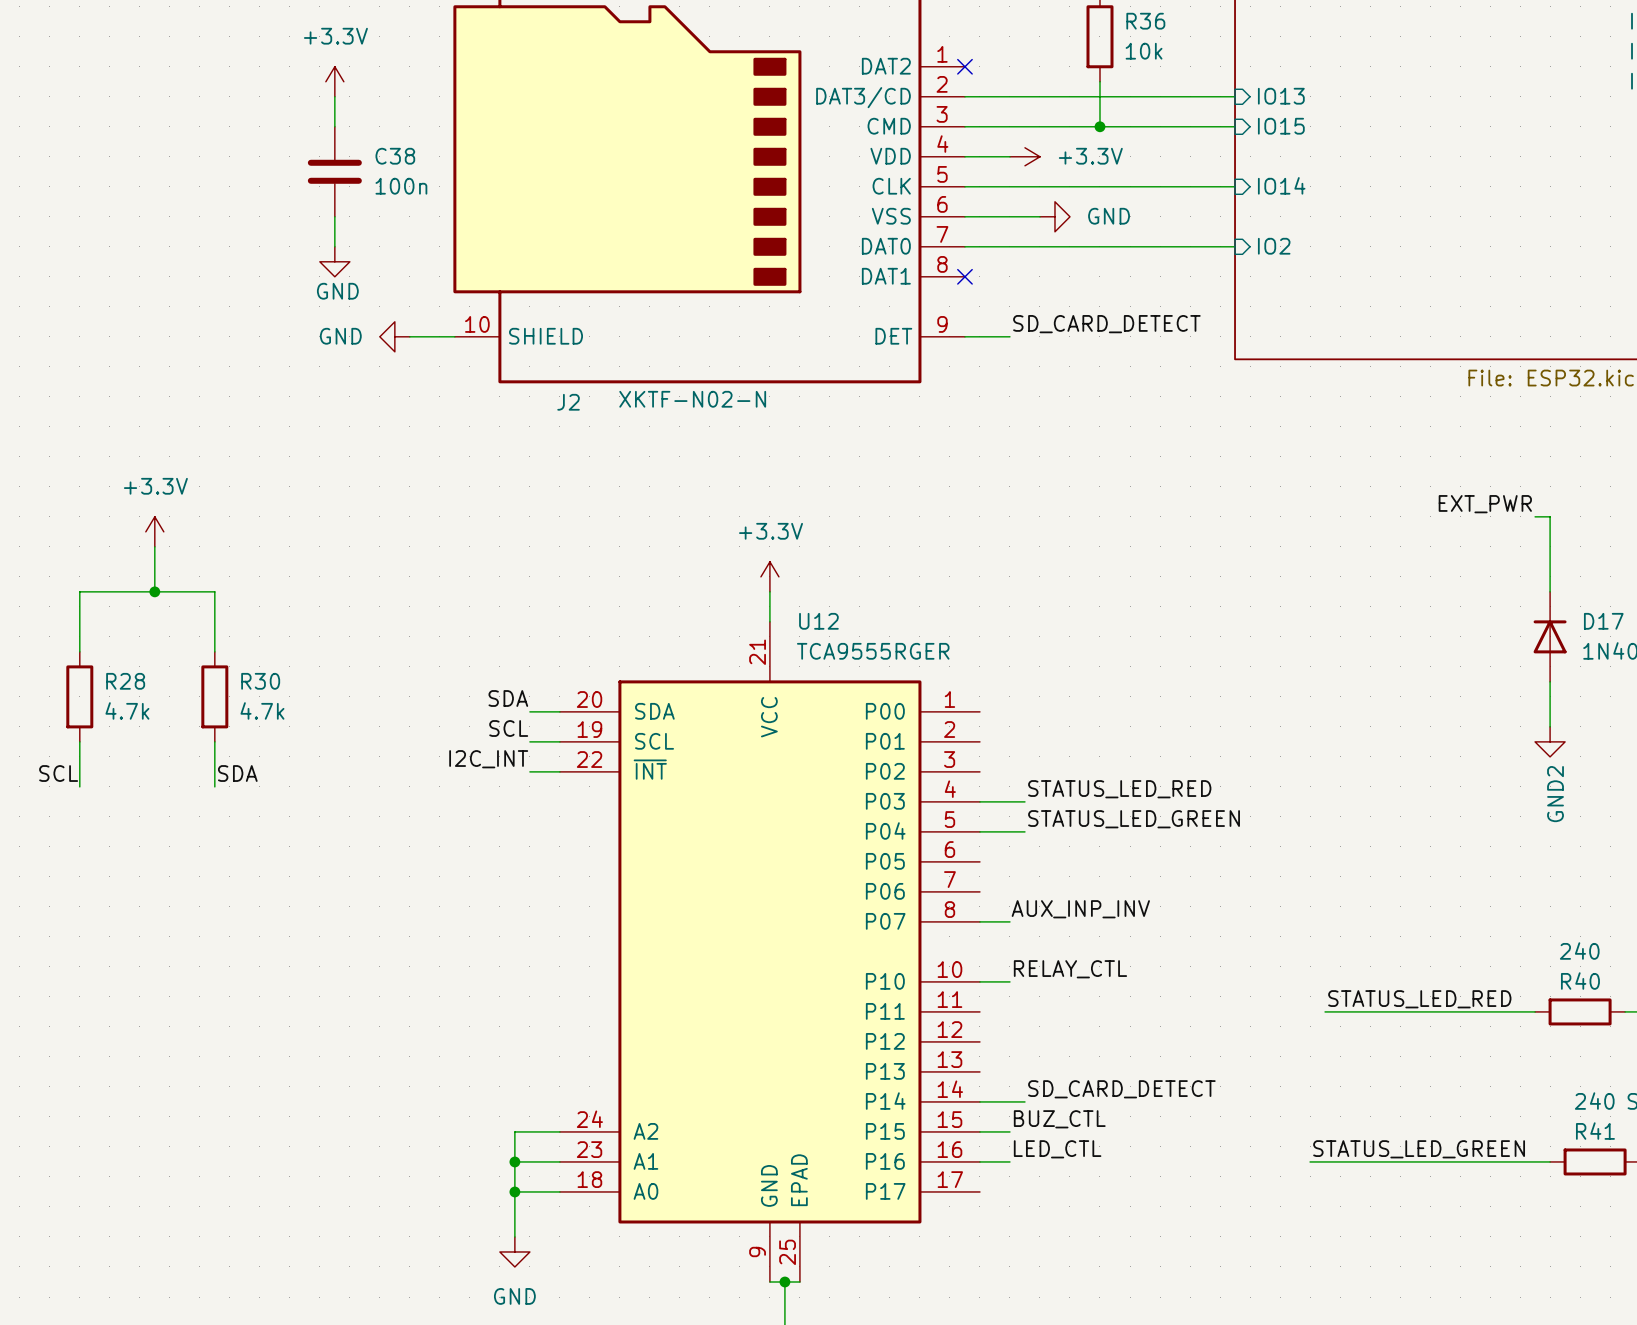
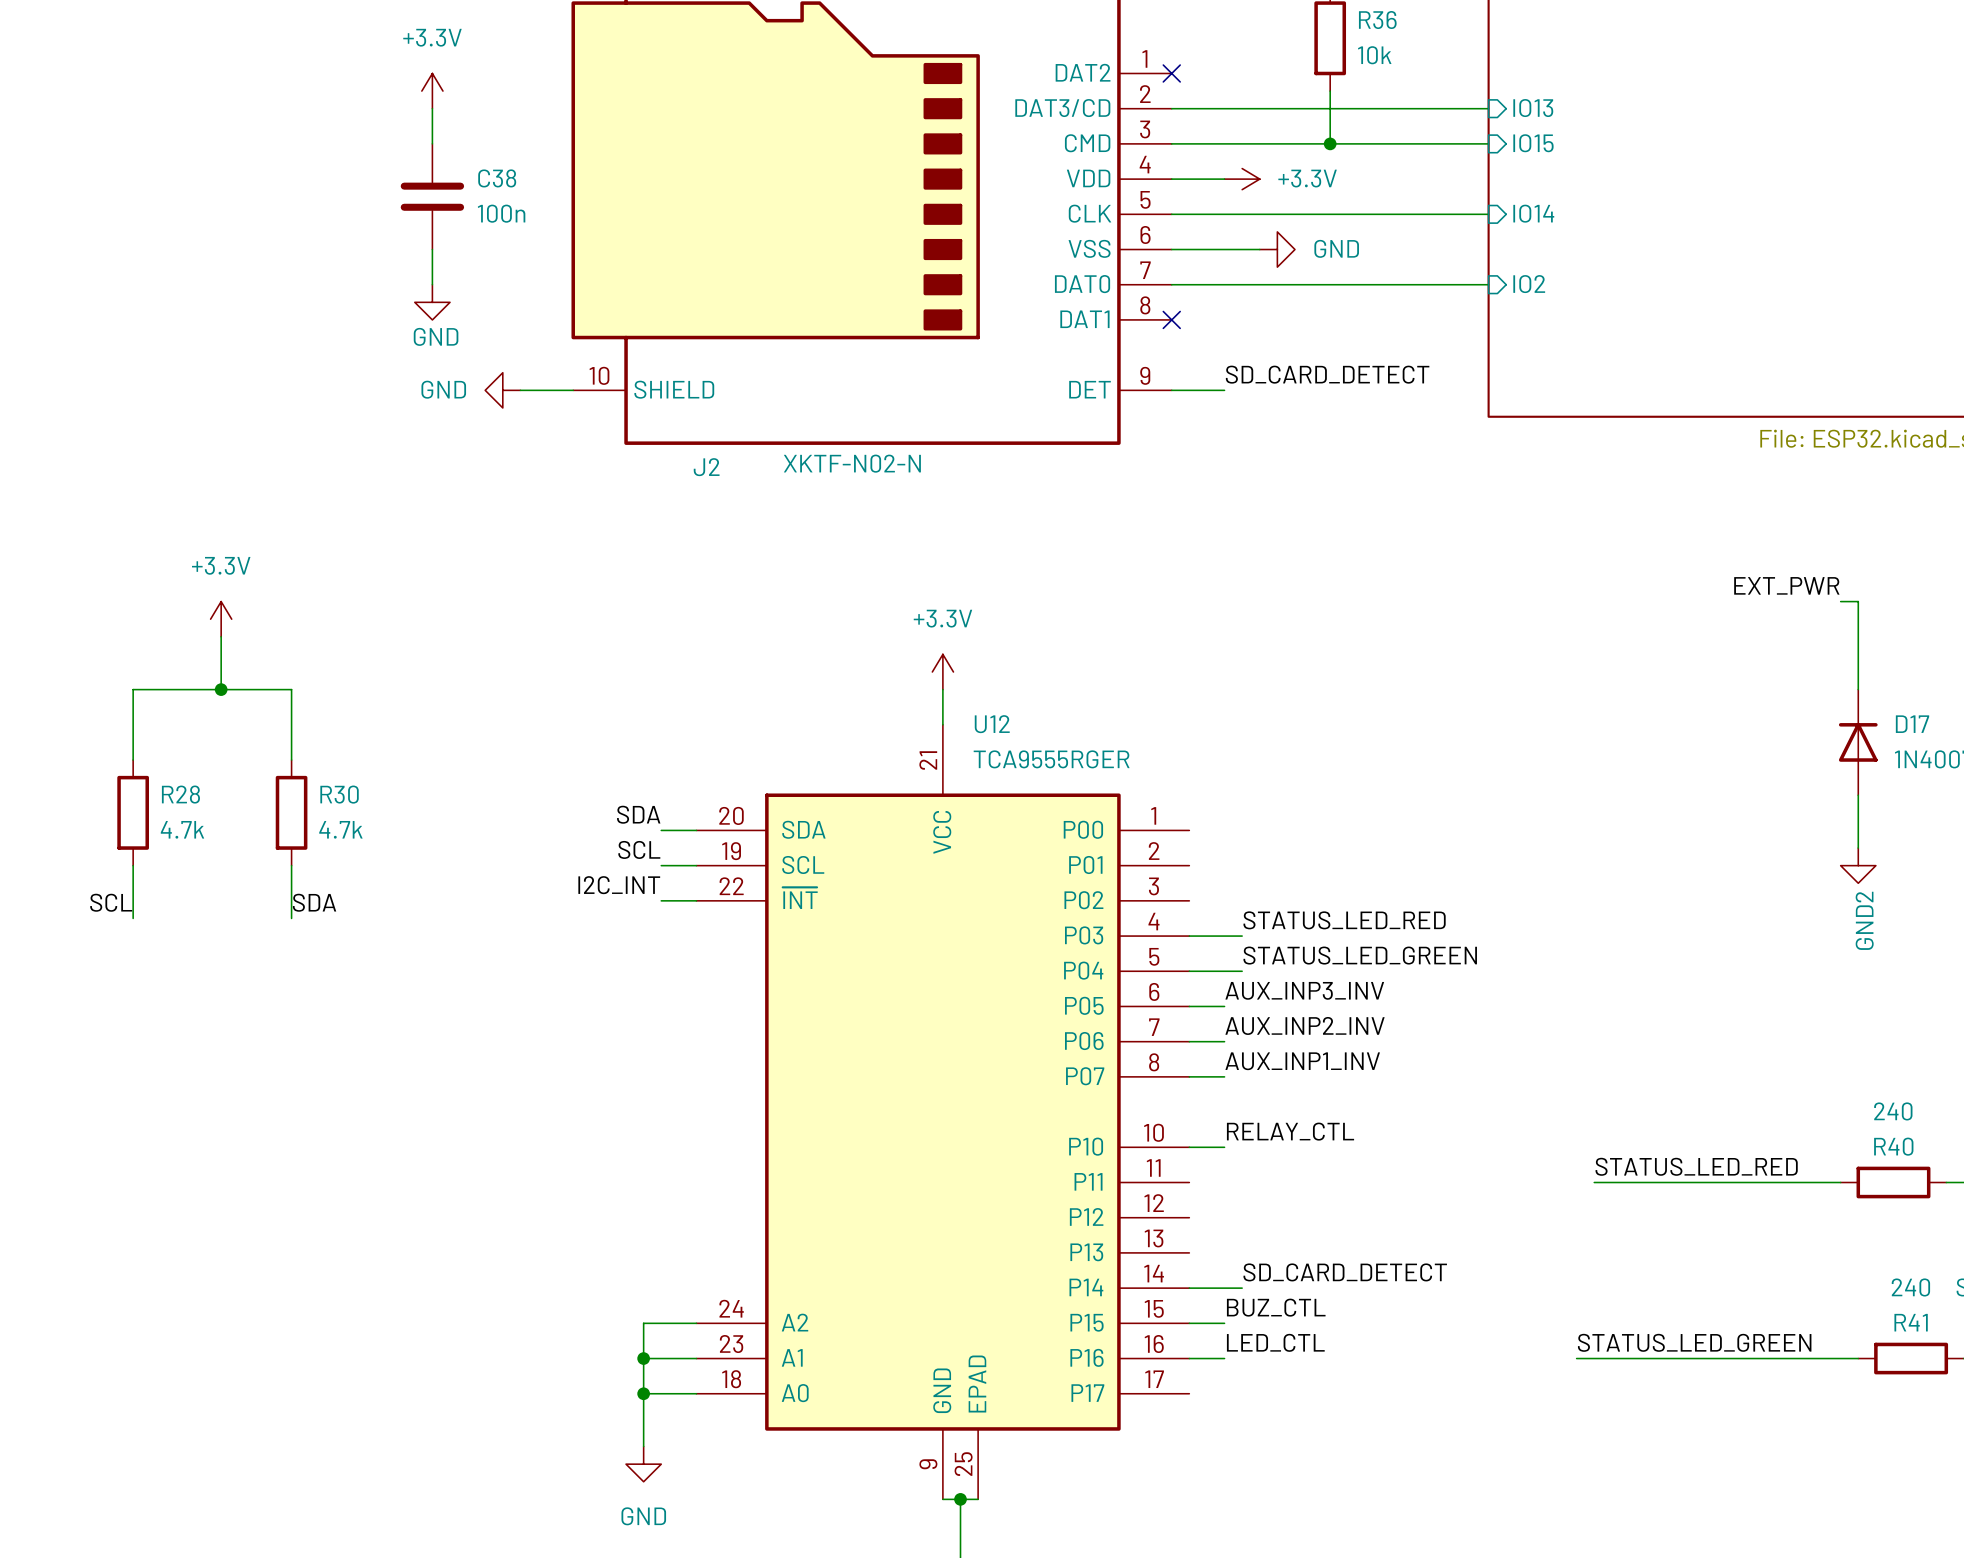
label: none -> AUX_INP3_INV (1304, 990)
wire: none -> (1189, 1006) (1224, 1006)
label: none -> AUX_INP2_INV (1305, 1025)
wire: none -> (1189, 1041) (1224, 1041)
label: AUX_INP_INV (1080, 909) -> AUX_INP1_INV (1302, 1061)

